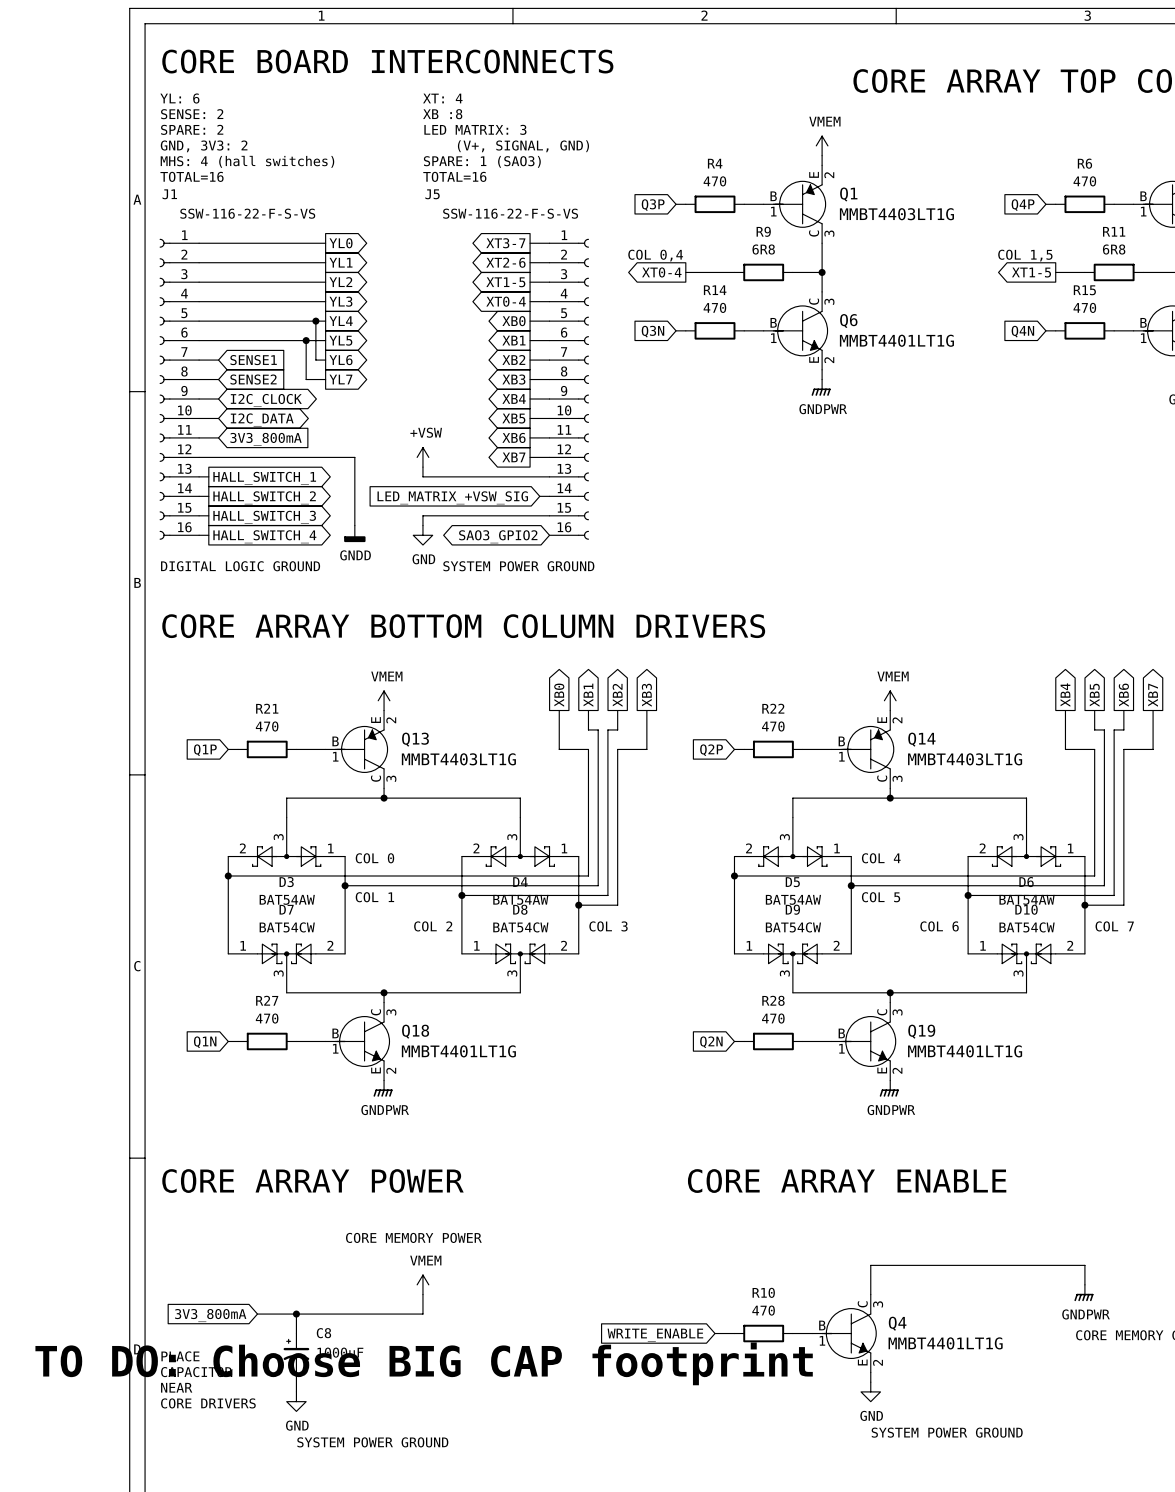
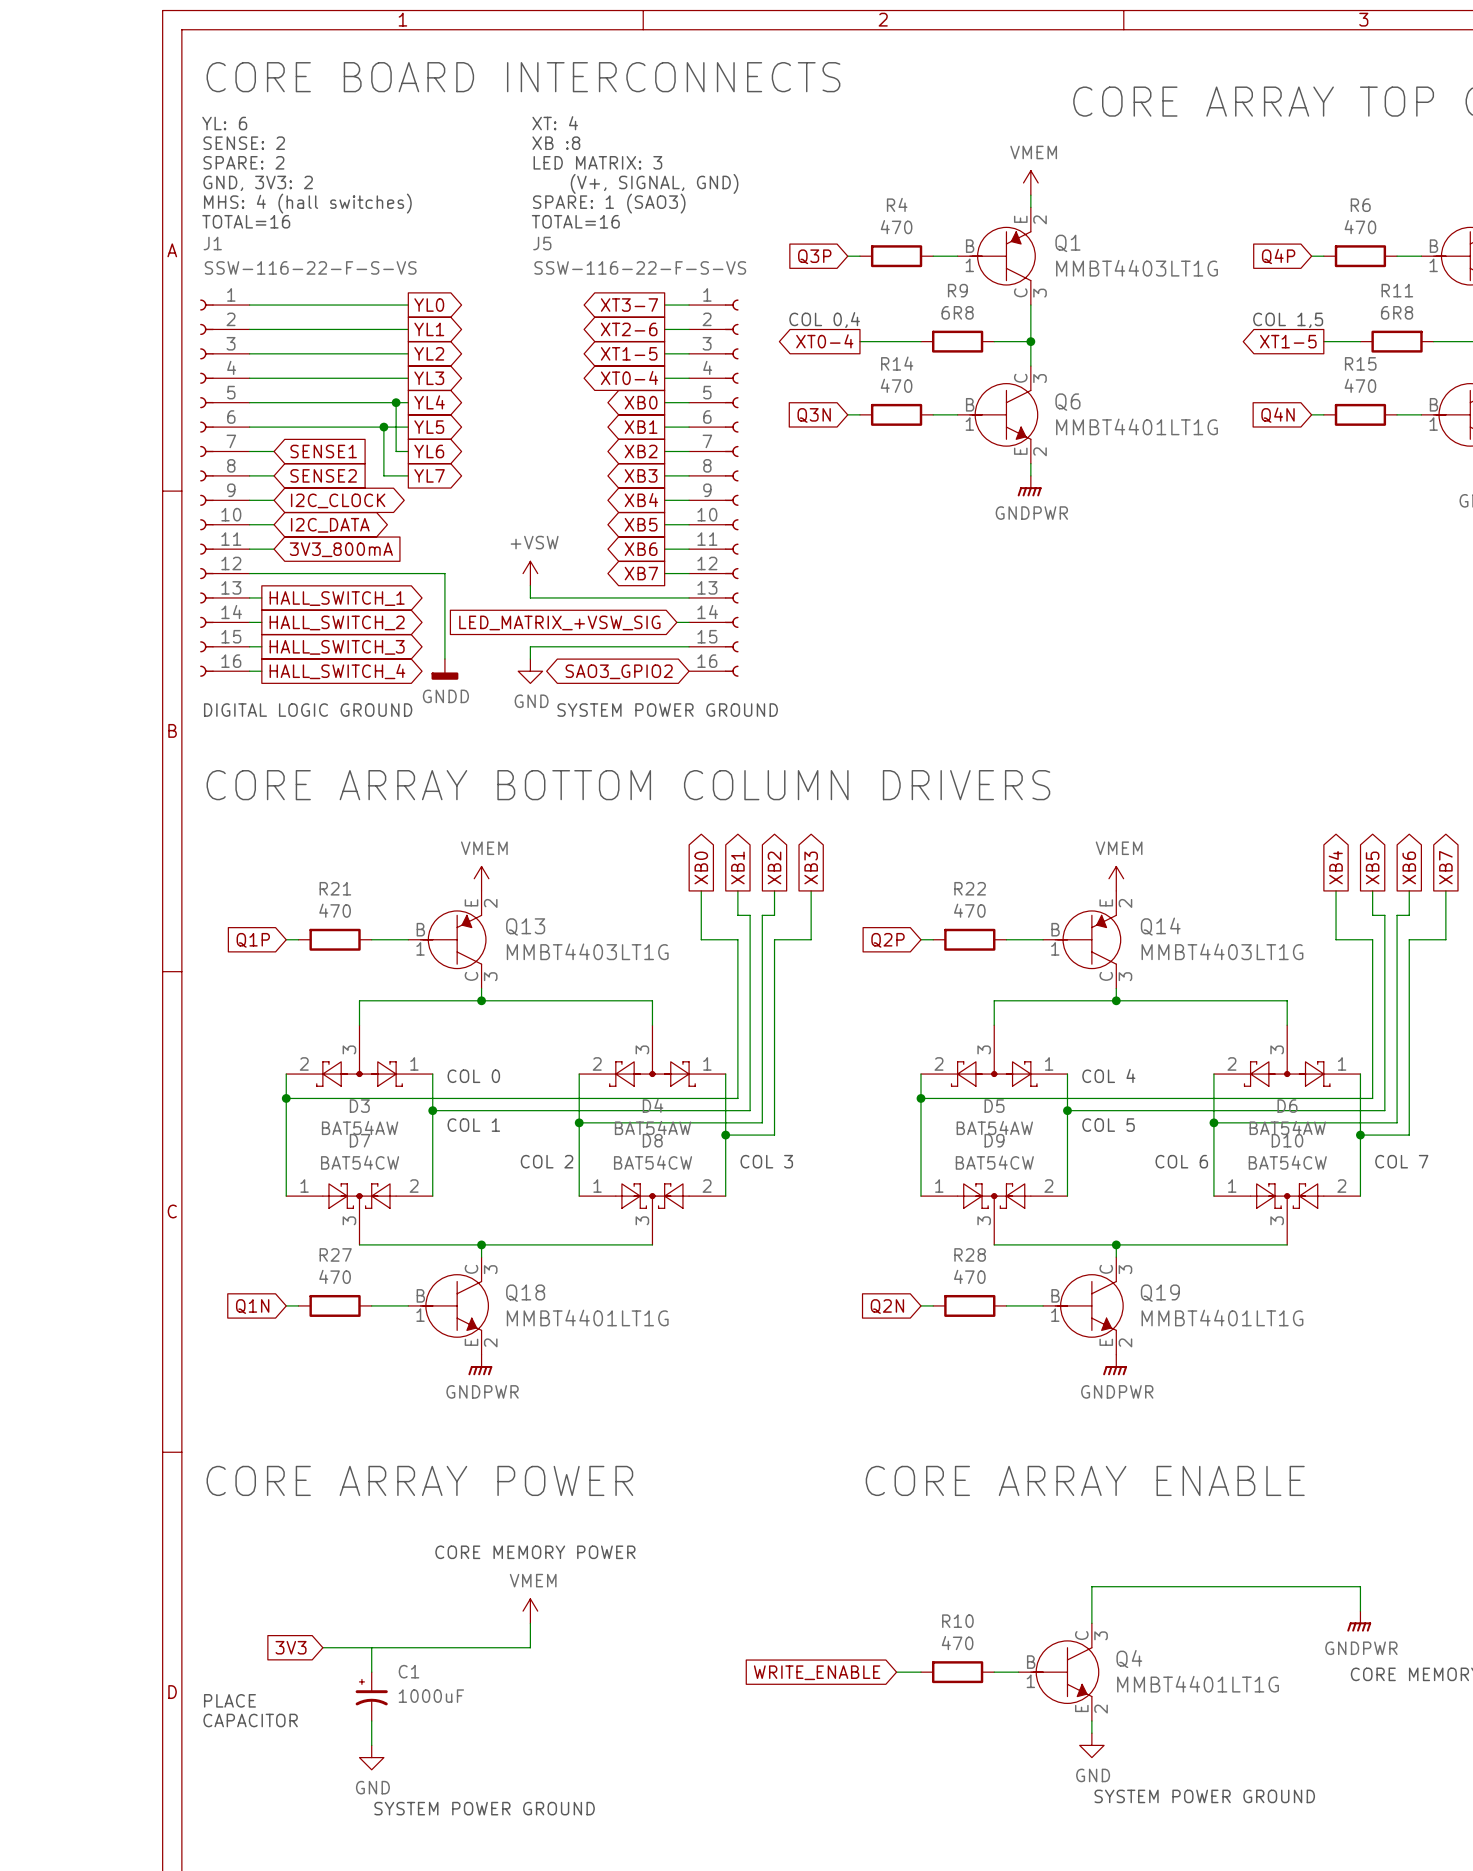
junction: (296, 1314) -> none
global label: 3V3_800mA (210, 1315) -> 3V3 (291, 1647)
C8 name: C8 (323, 1333) -> C1 (408, 1671)
text: TO DO: Choose BIG CAP footprint (424, 1363) -> none
text: NEAR (176, 1387) -> none
text: CORE DRIVERS (208, 1403) -> none

